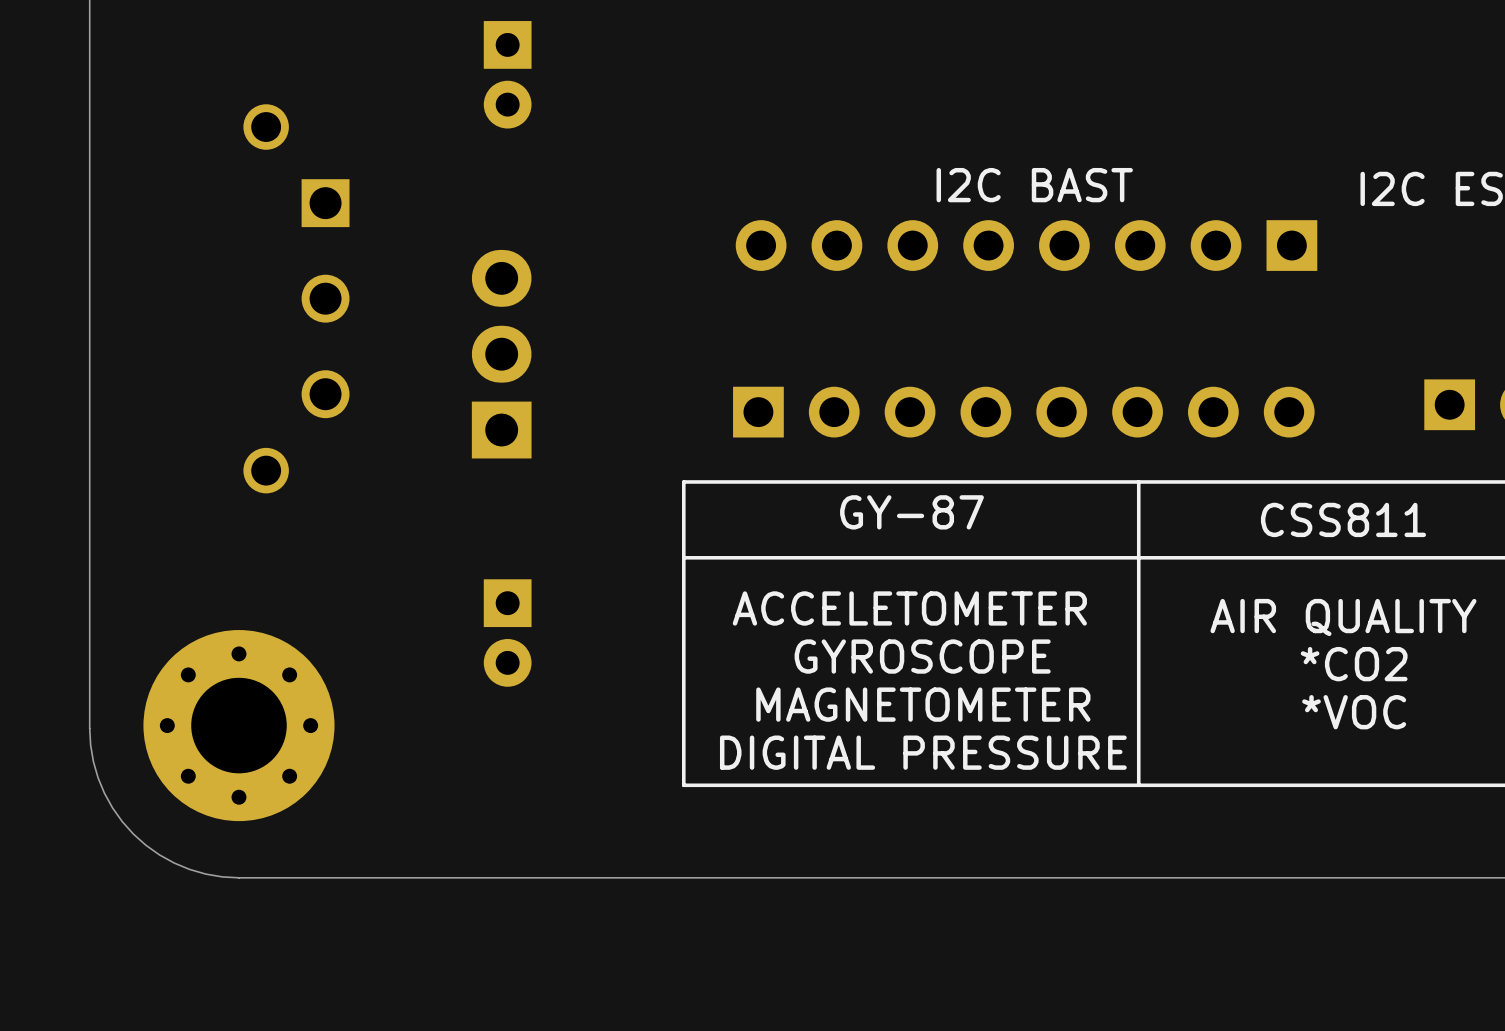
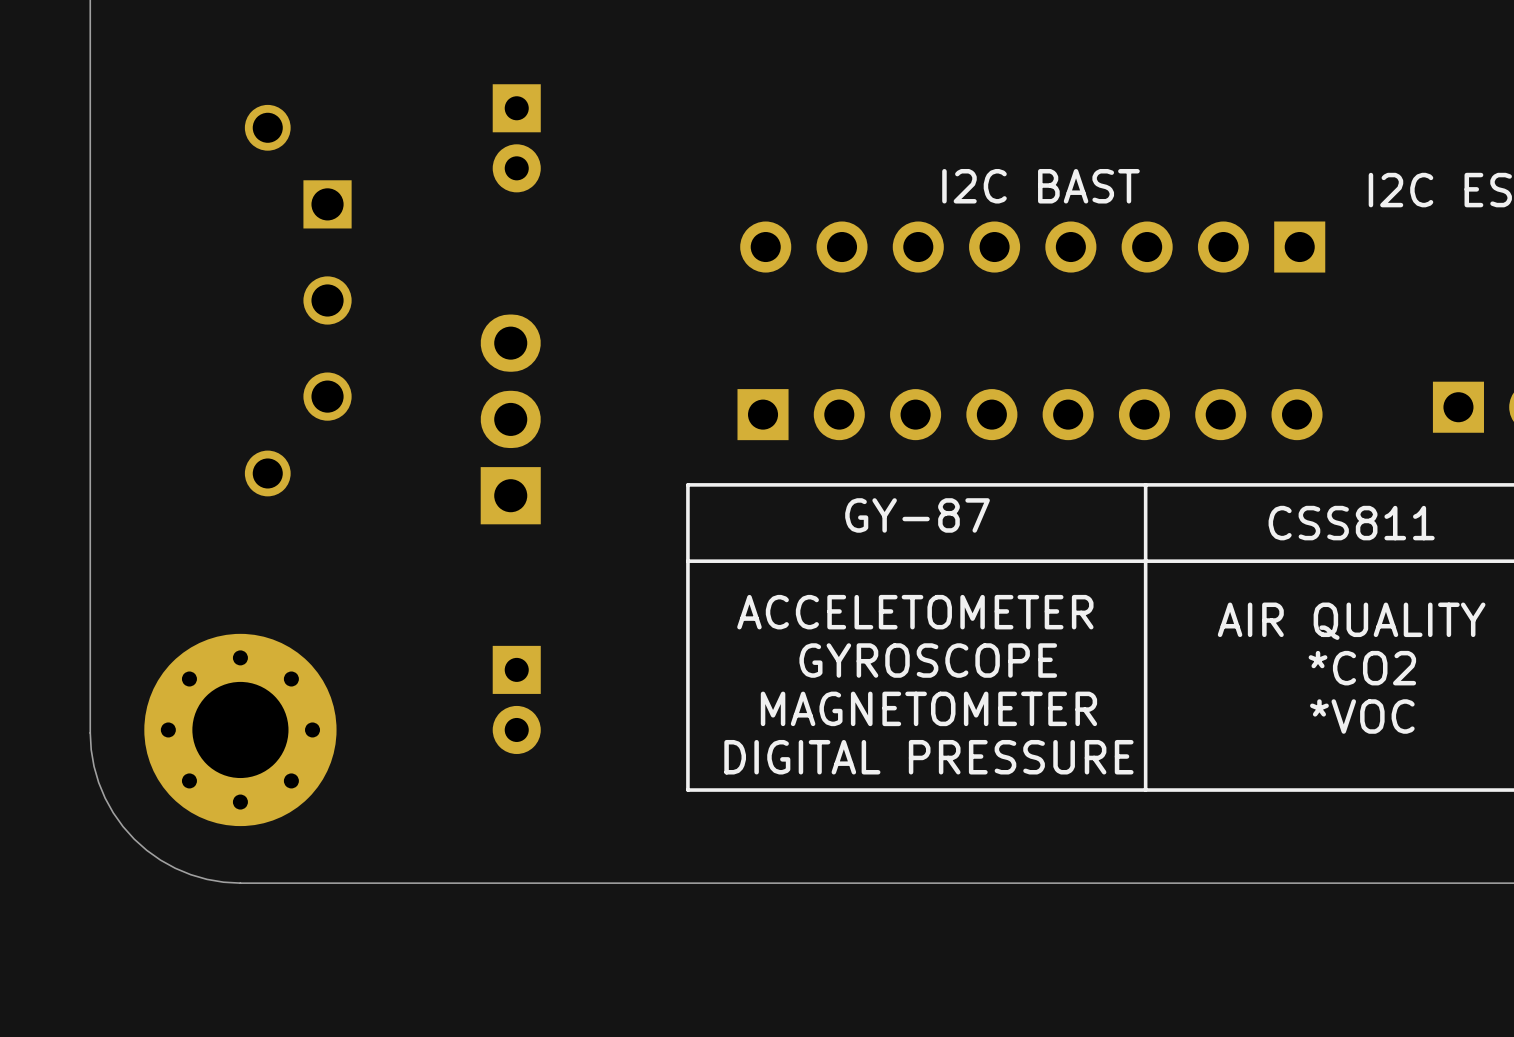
part position: (507, 74) -> (516, 138)
part position: (501, 354) -> (510, 419)
part position: (507, 633) -> (516, 699)

